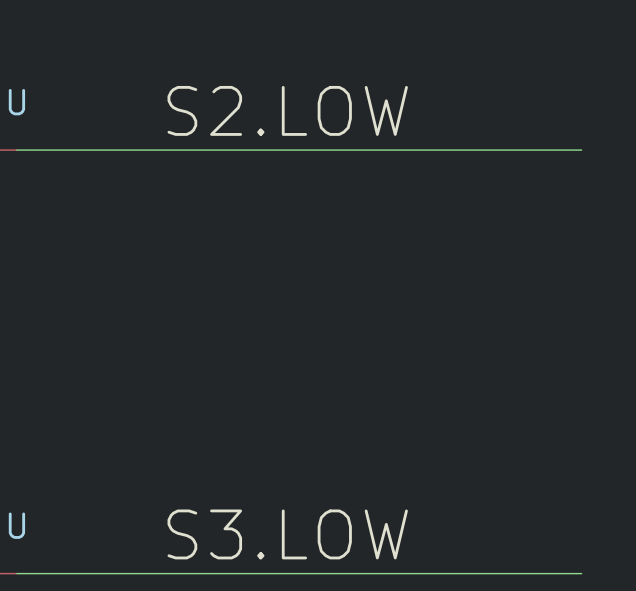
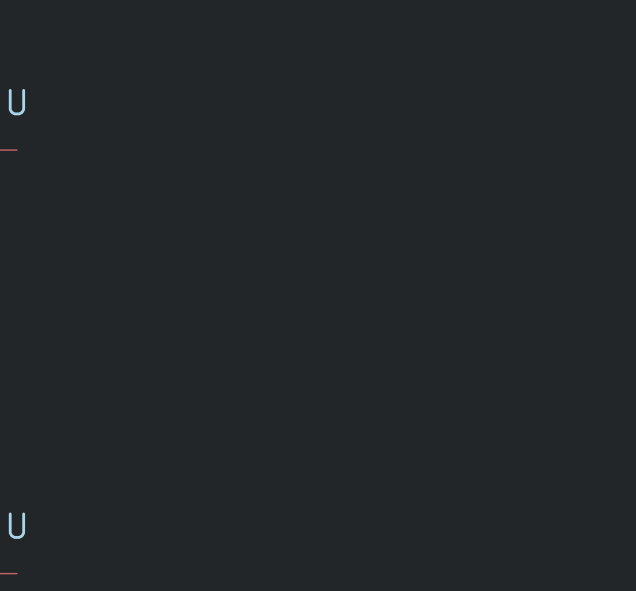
label: S2.LOW (287, 110) -> none
wire: (16, 150) (581, 150) -> none
label: S3.LOW (287, 534) -> none
wire: (16, 573) (581, 573) -> none

